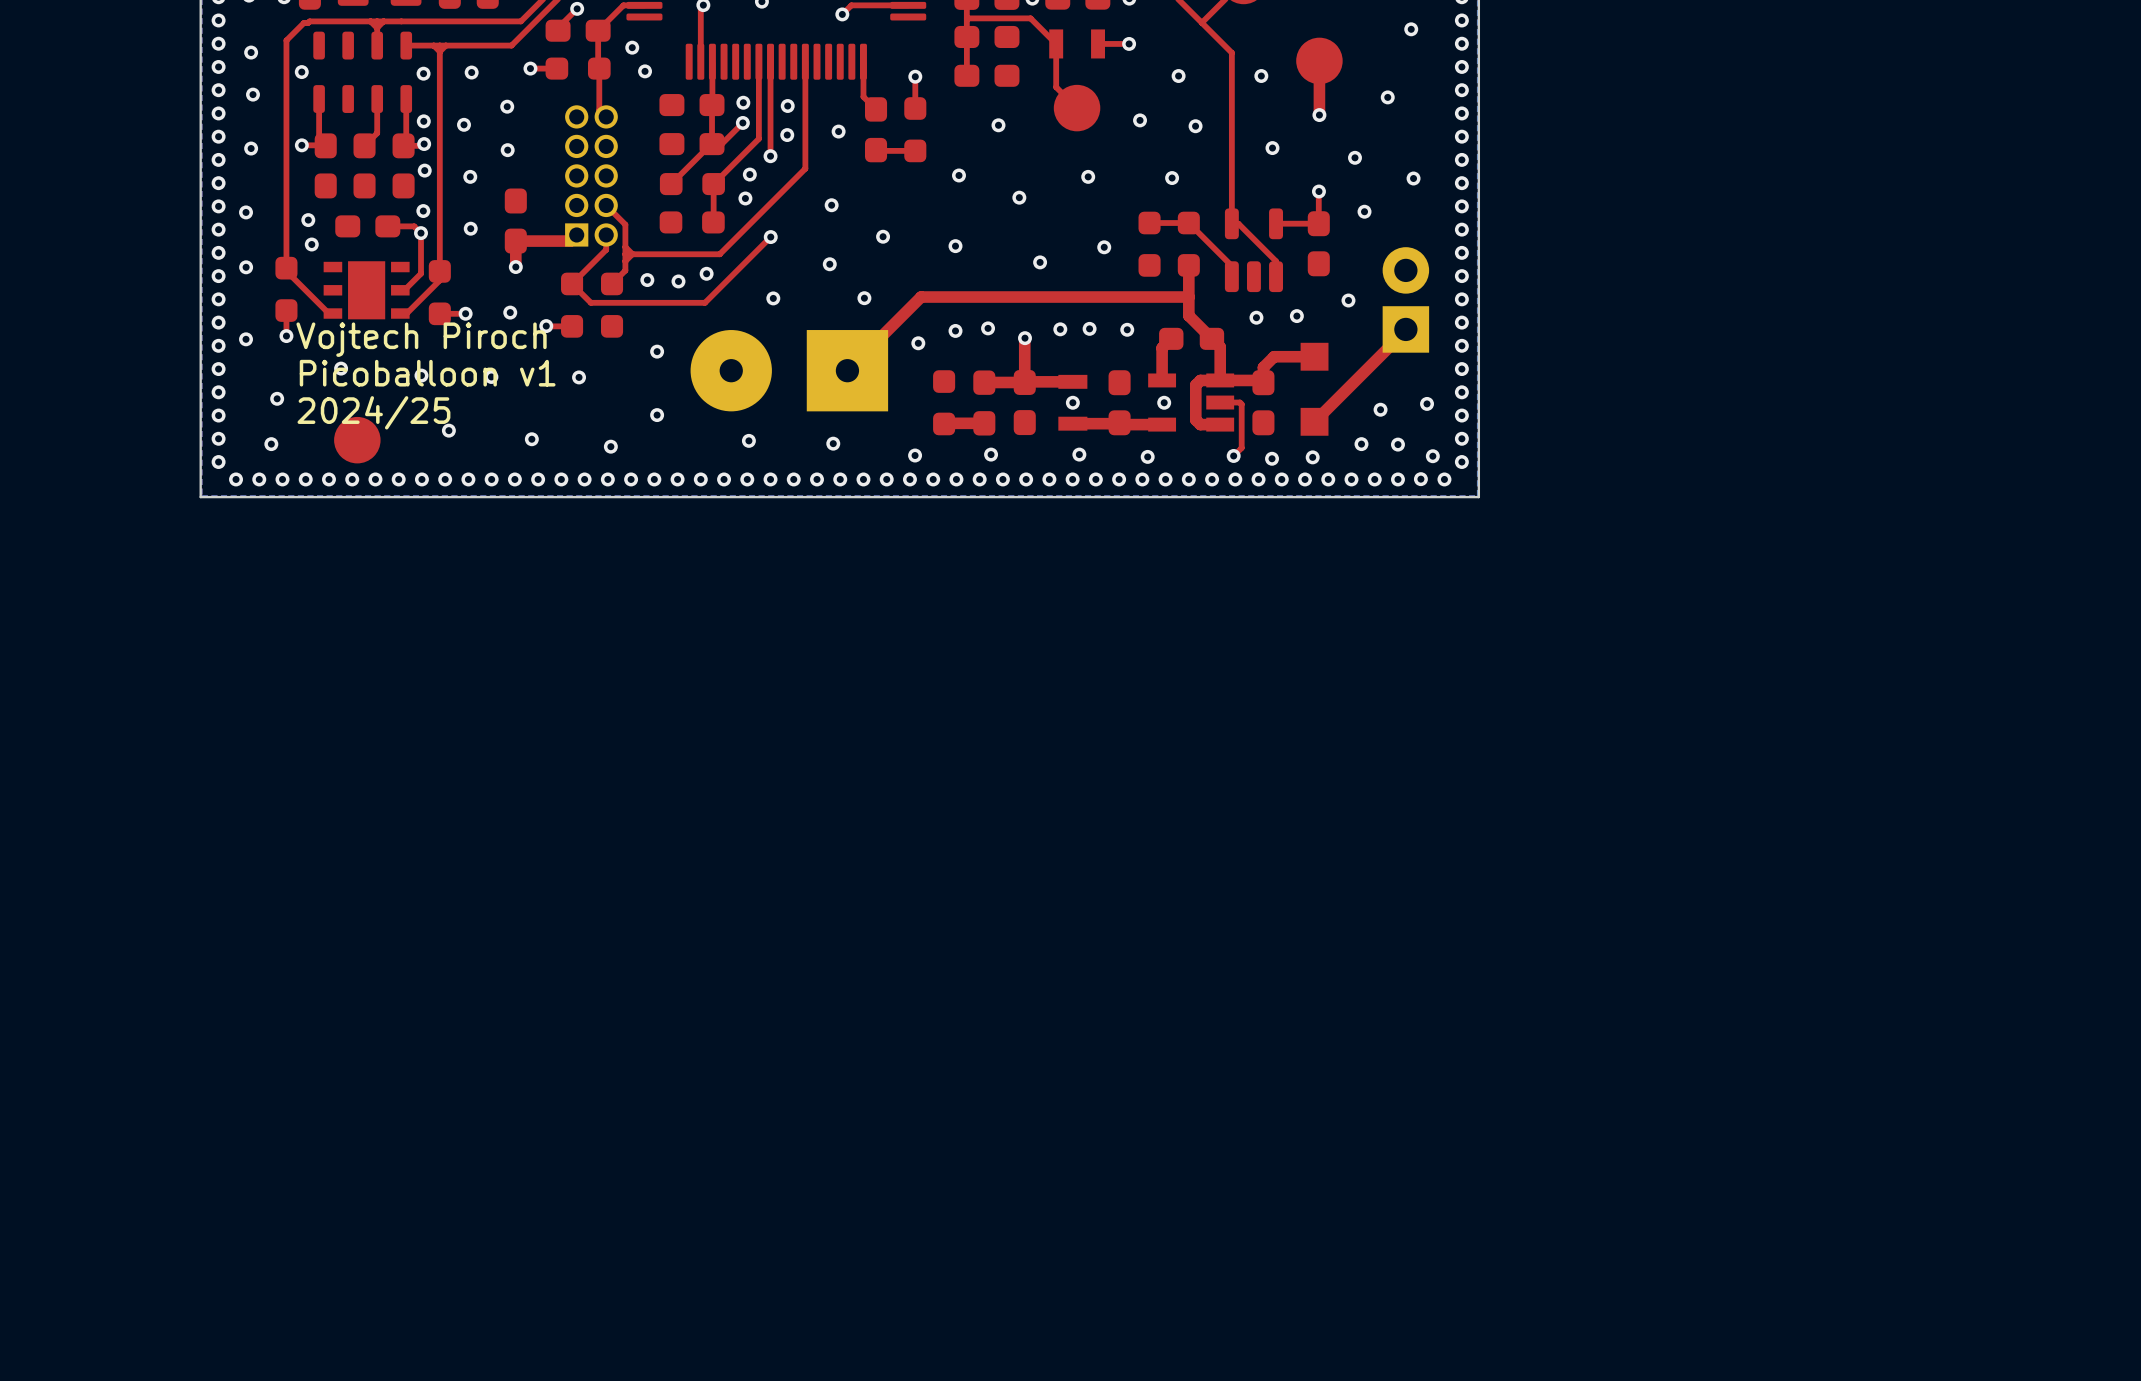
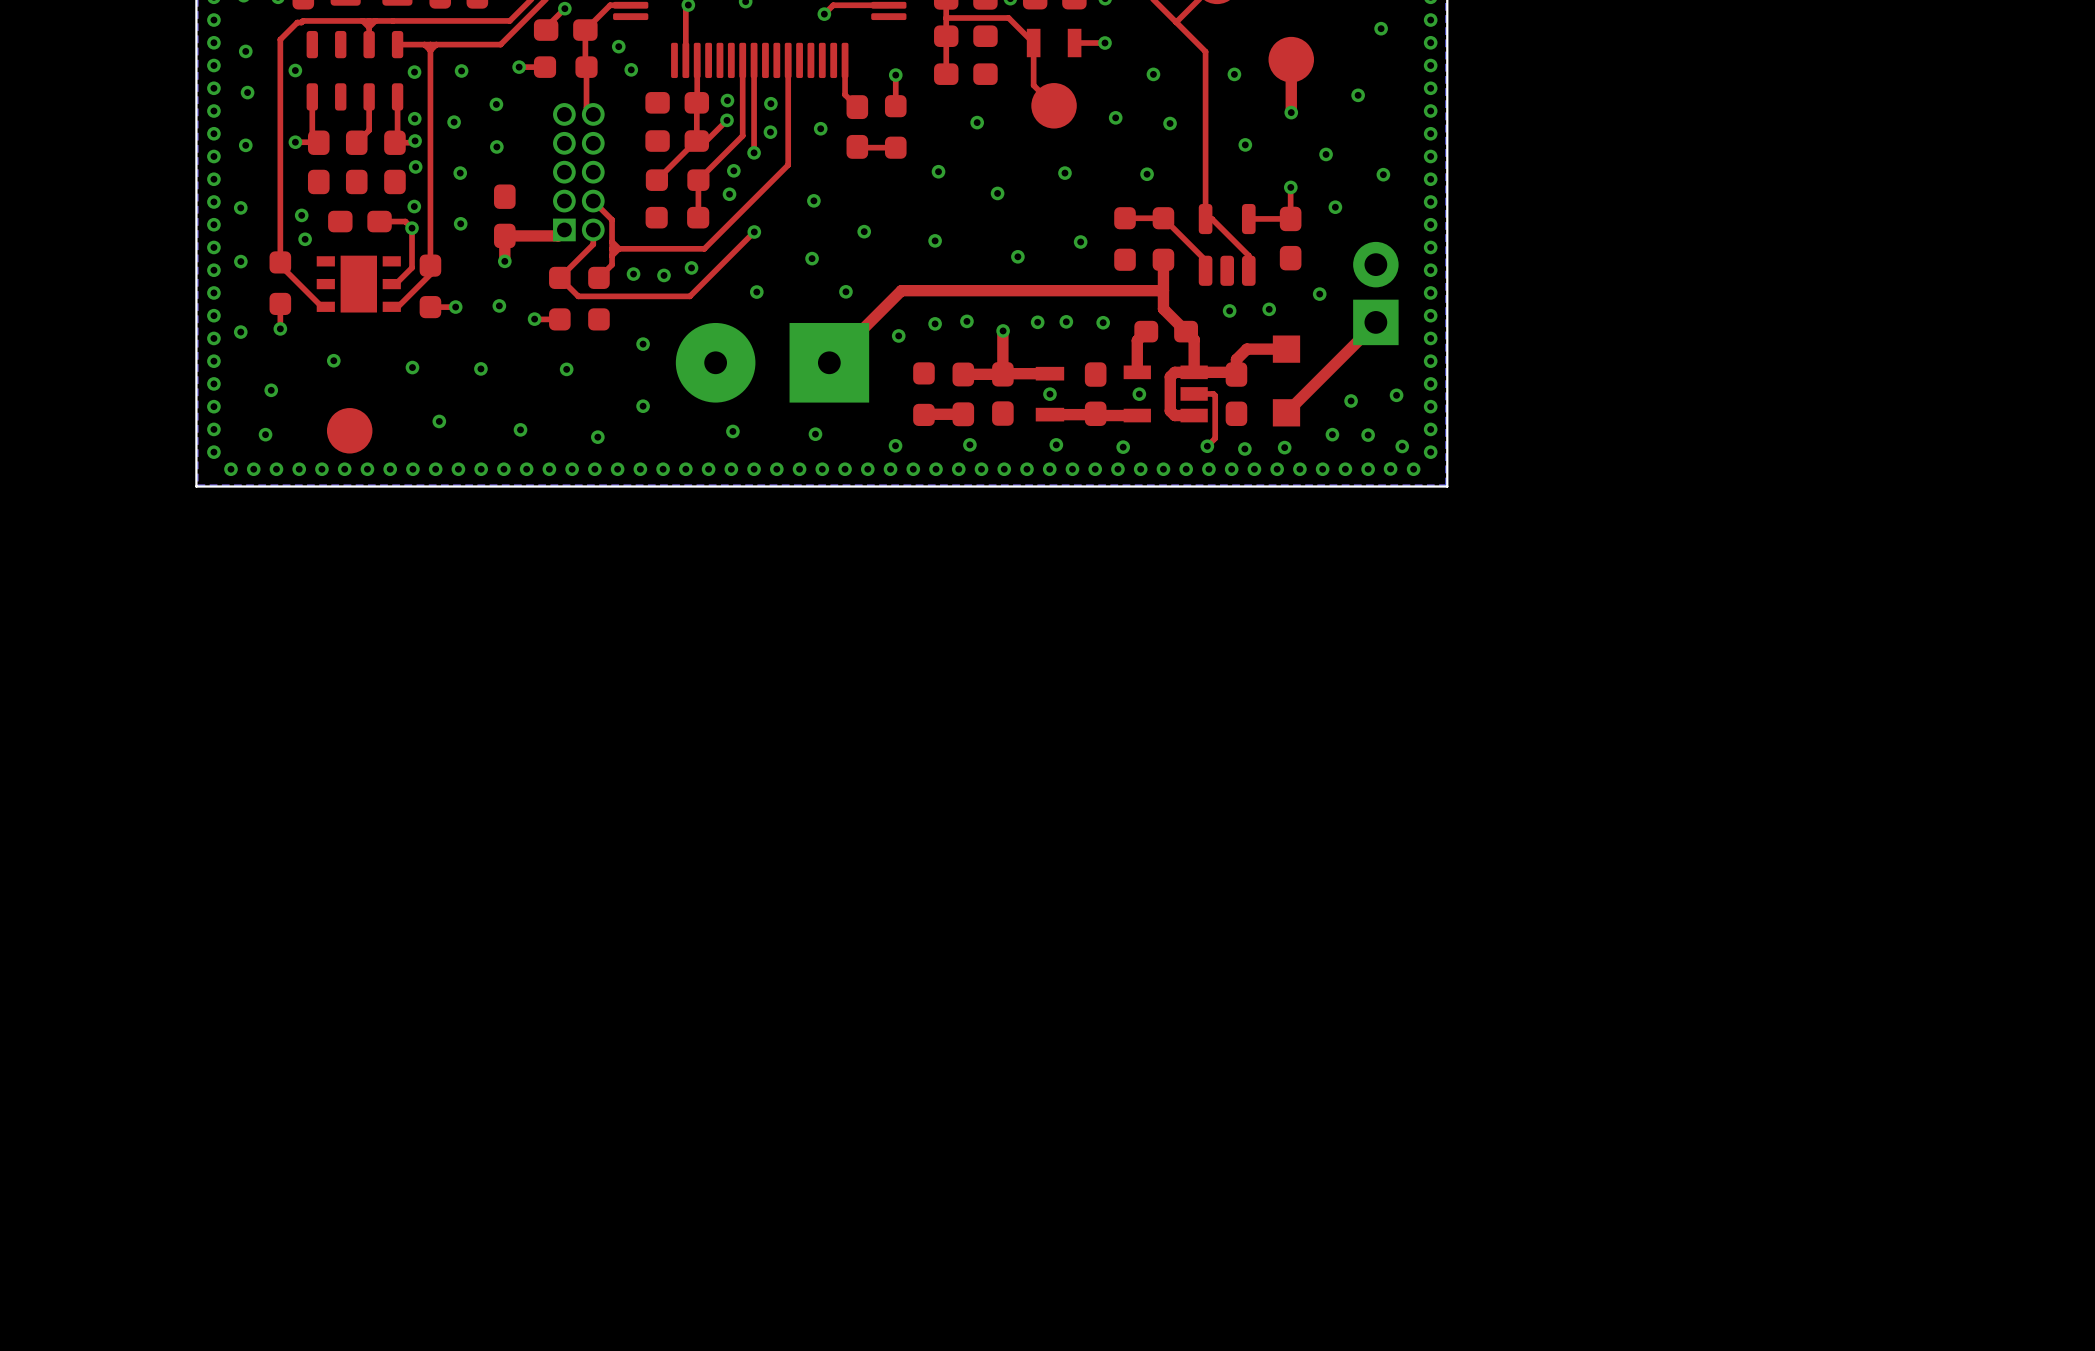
text: Vojtech Piroch (421, 339) -> none
text: Picoballoon v1 (427, 373) -> none
text: 2024/25 (373, 412) -> none

